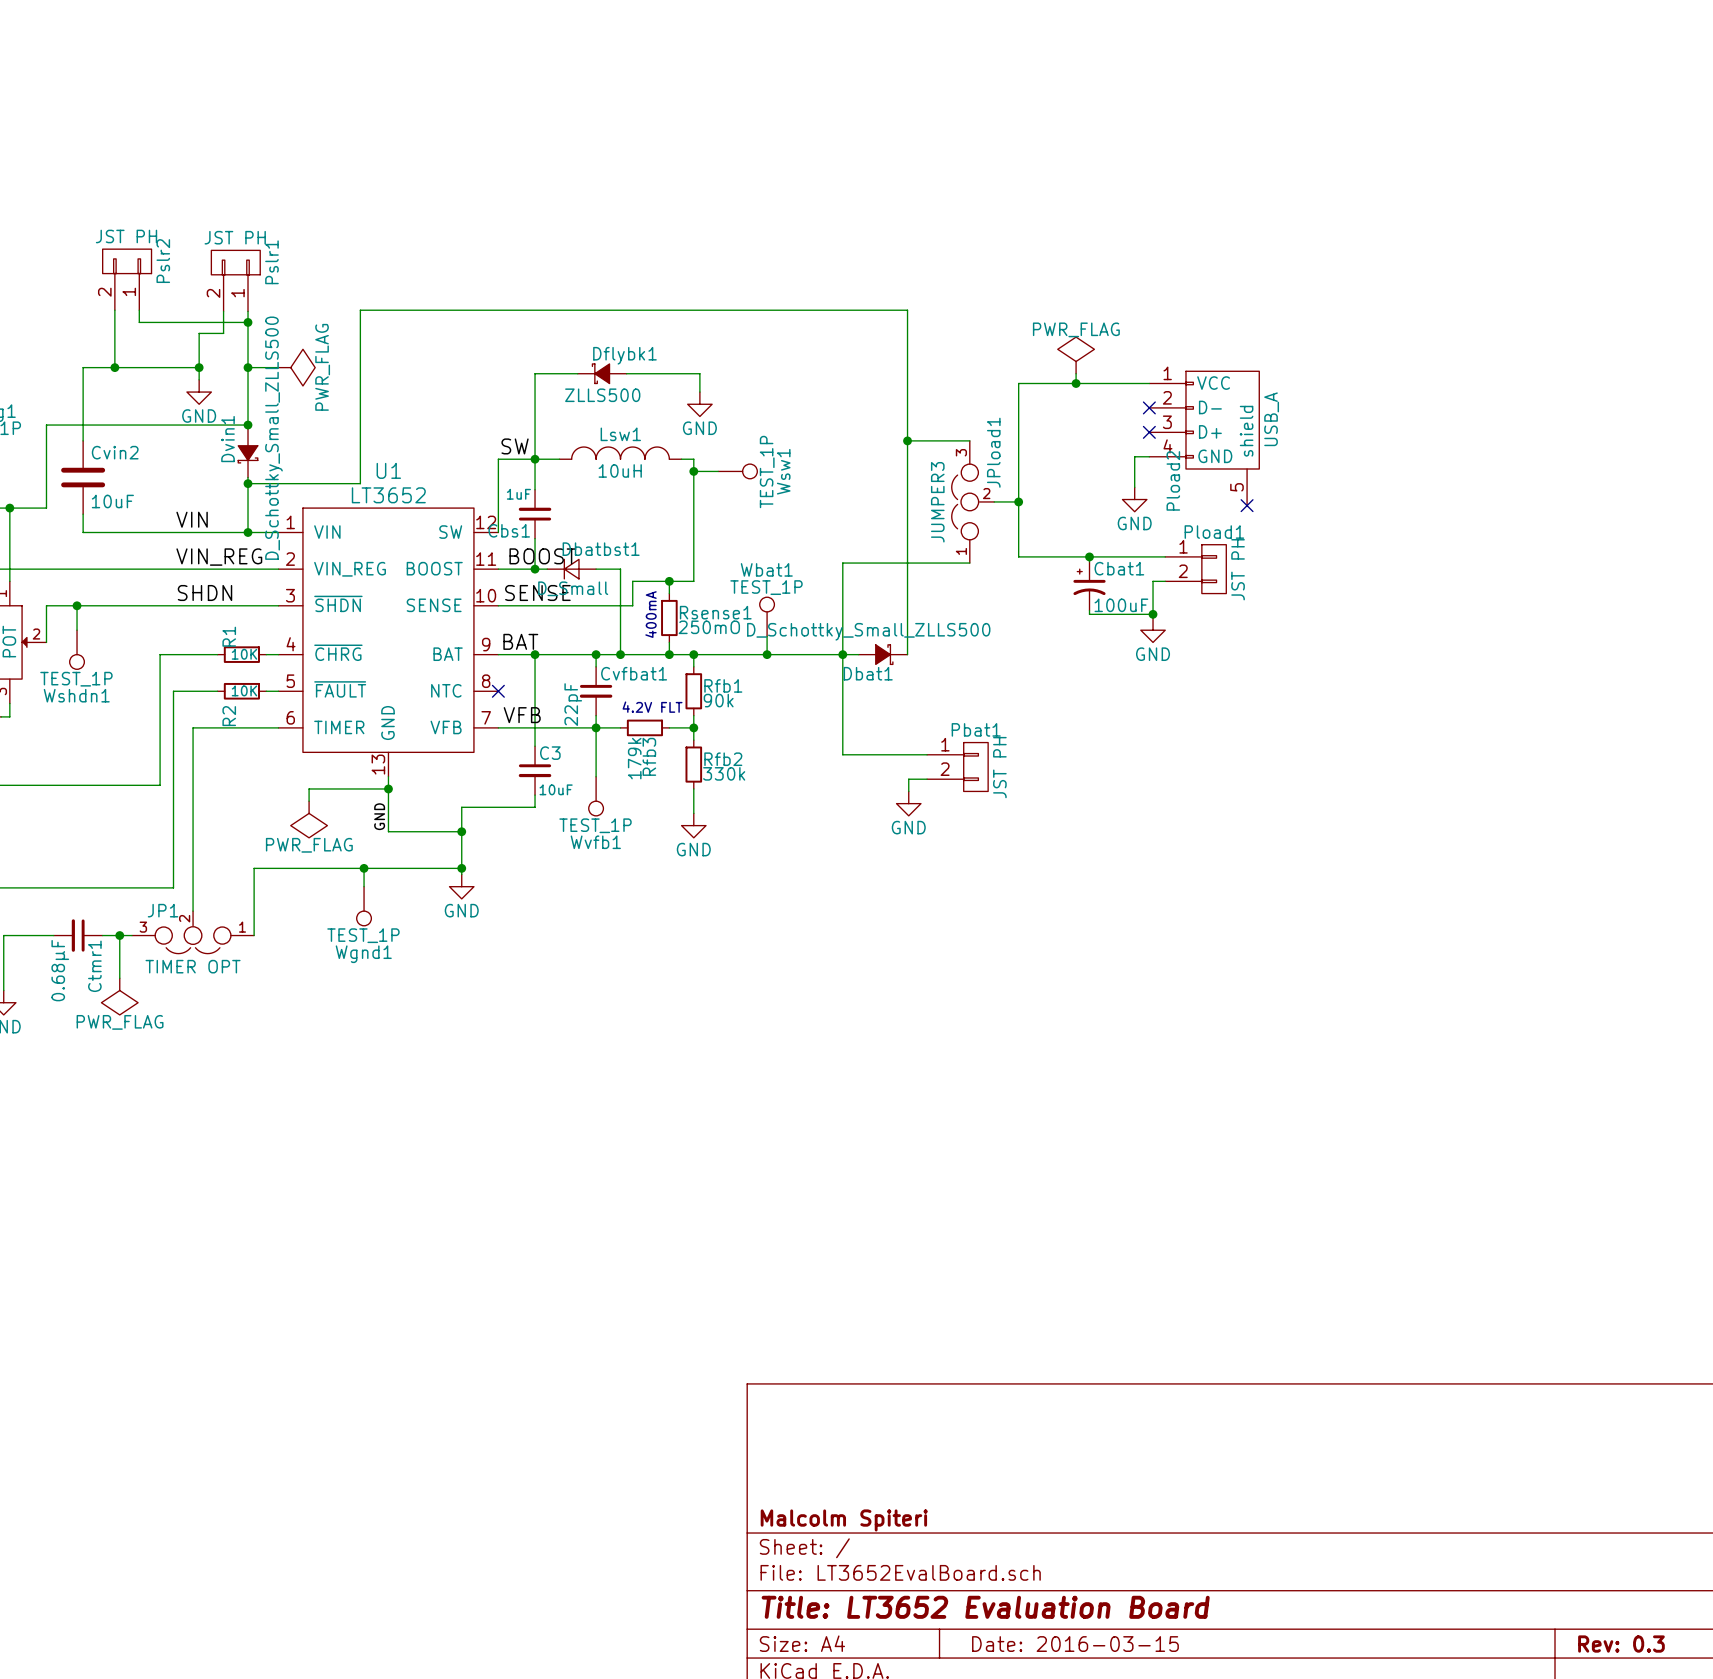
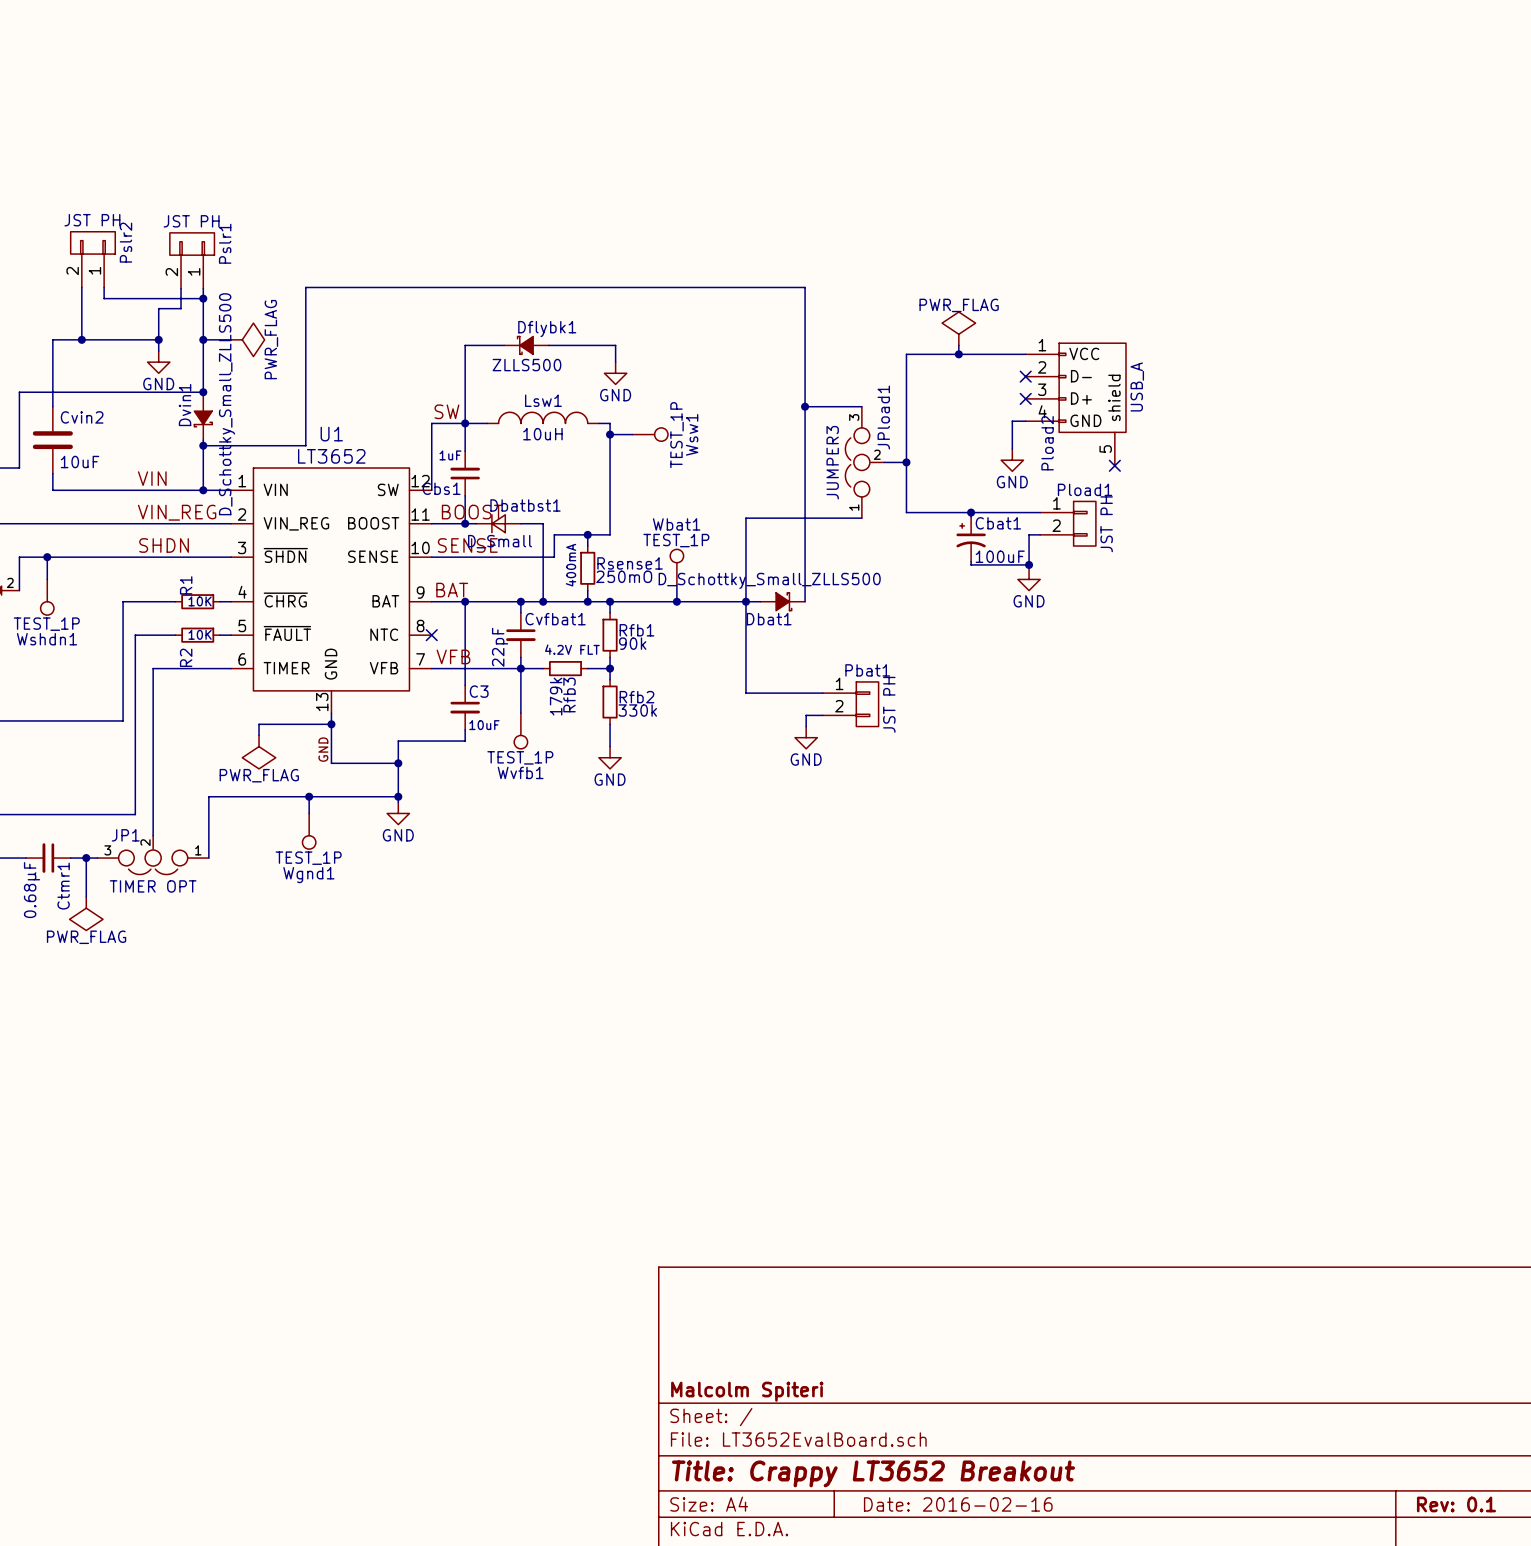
title block: Title: LT3652 Evaluation Board (985, 1607) -> Title: Crappy LT3652 Breakout (873, 1473)
title block: Date: 2016-03-15 (1075, 1644) -> Date: 2016-02-16 (958, 1504)
title block: Rev: 0.3 (1621, 1644) -> Rev: 0.1 (1456, 1504)

